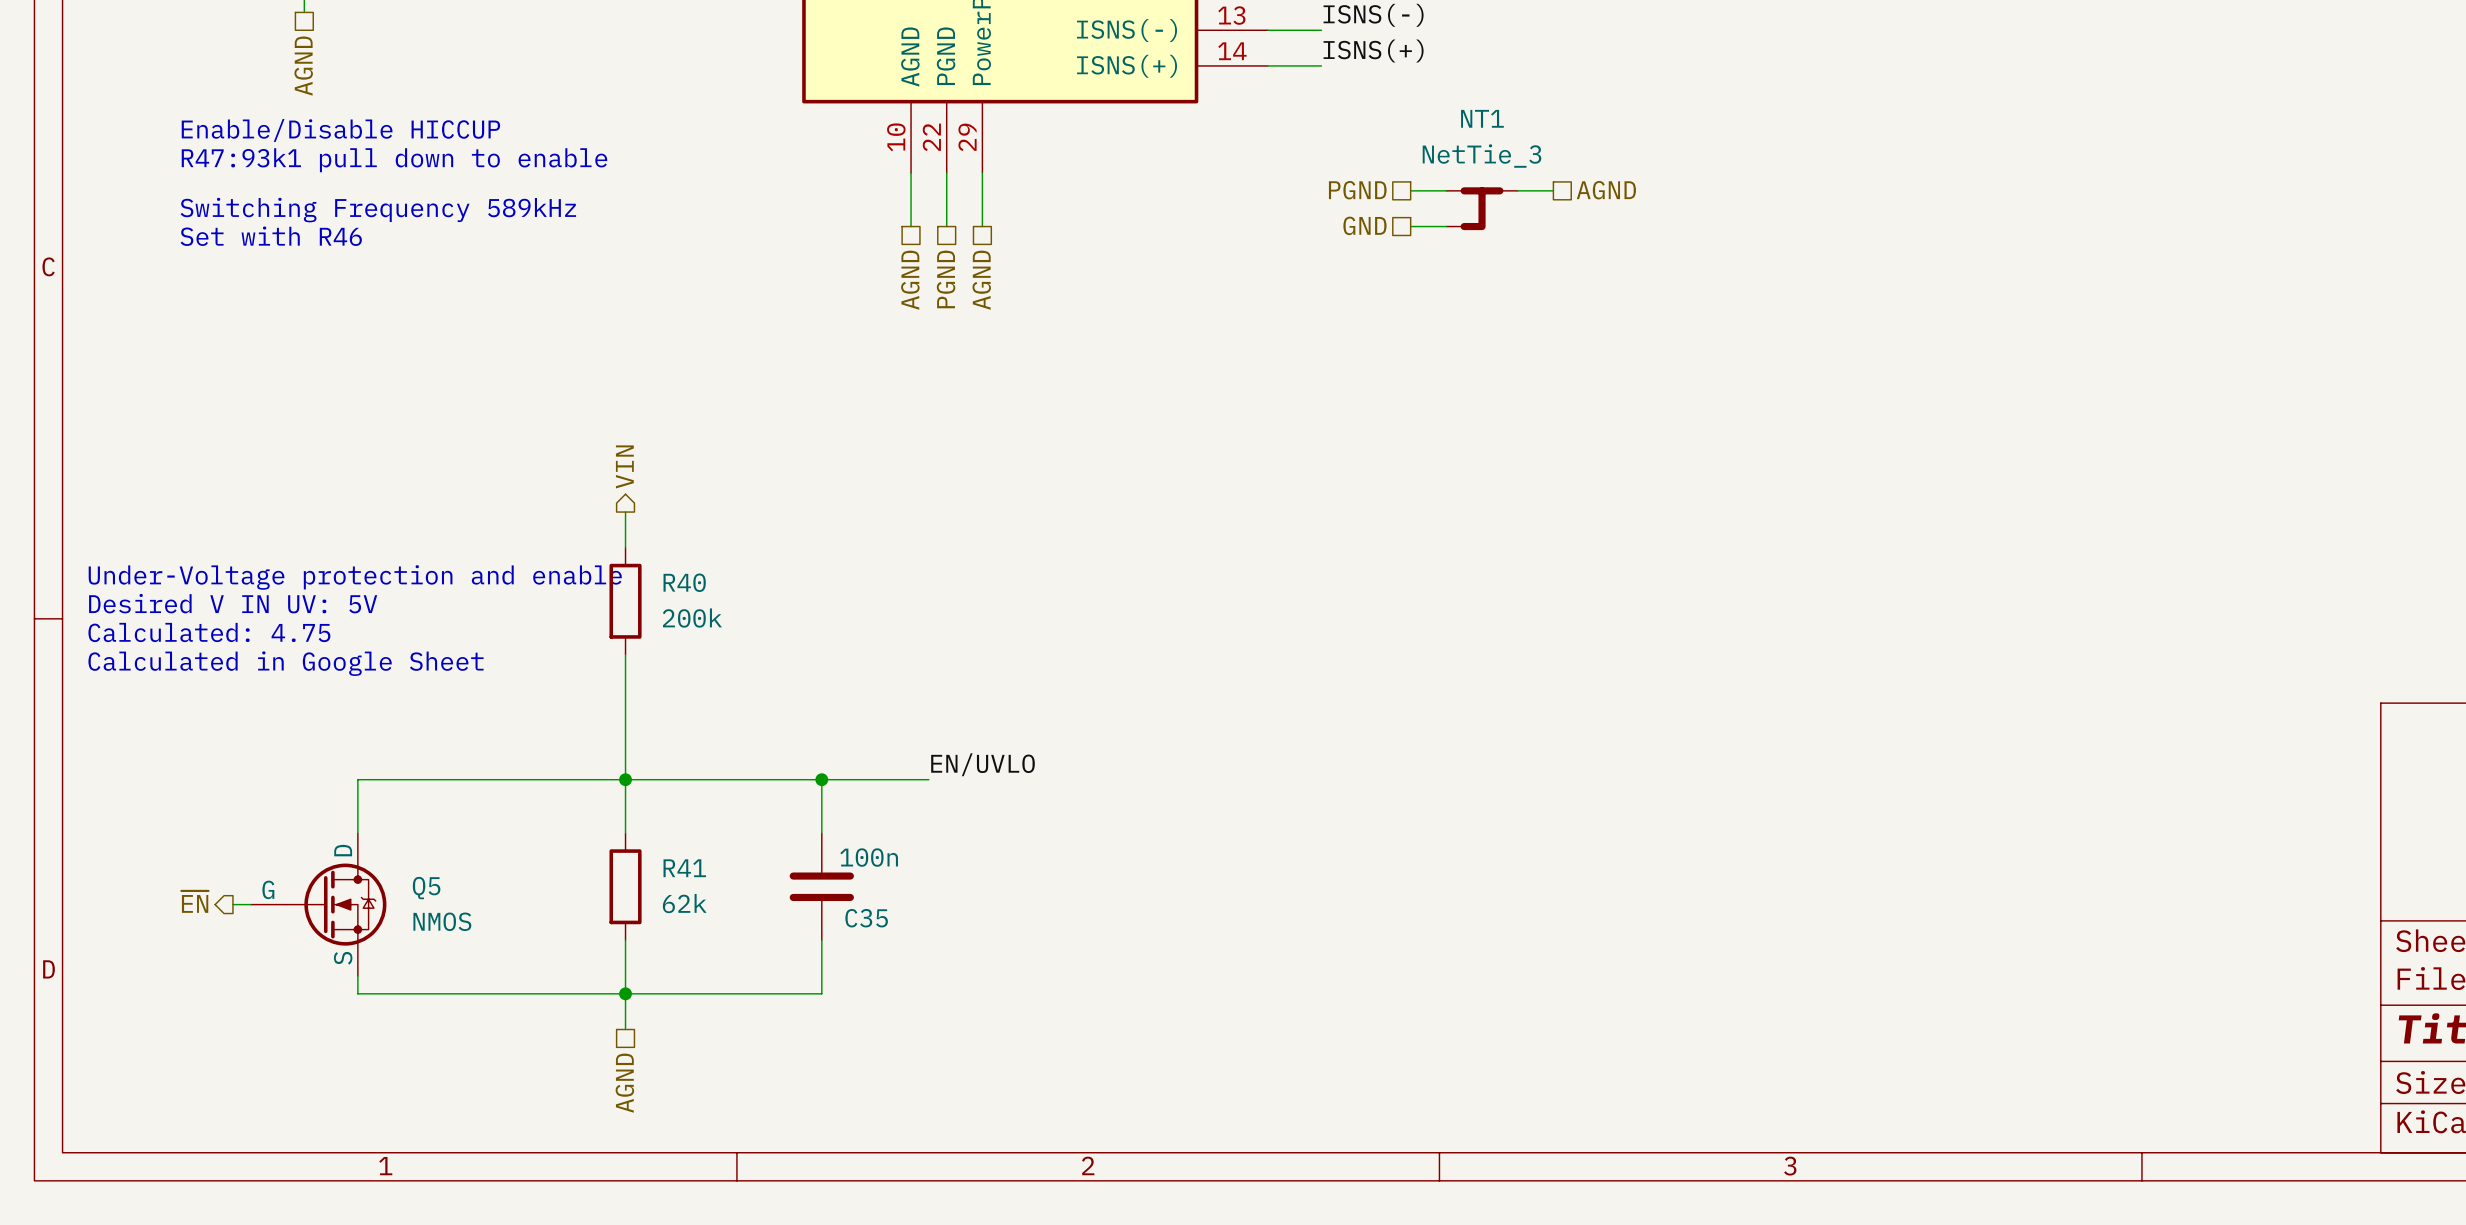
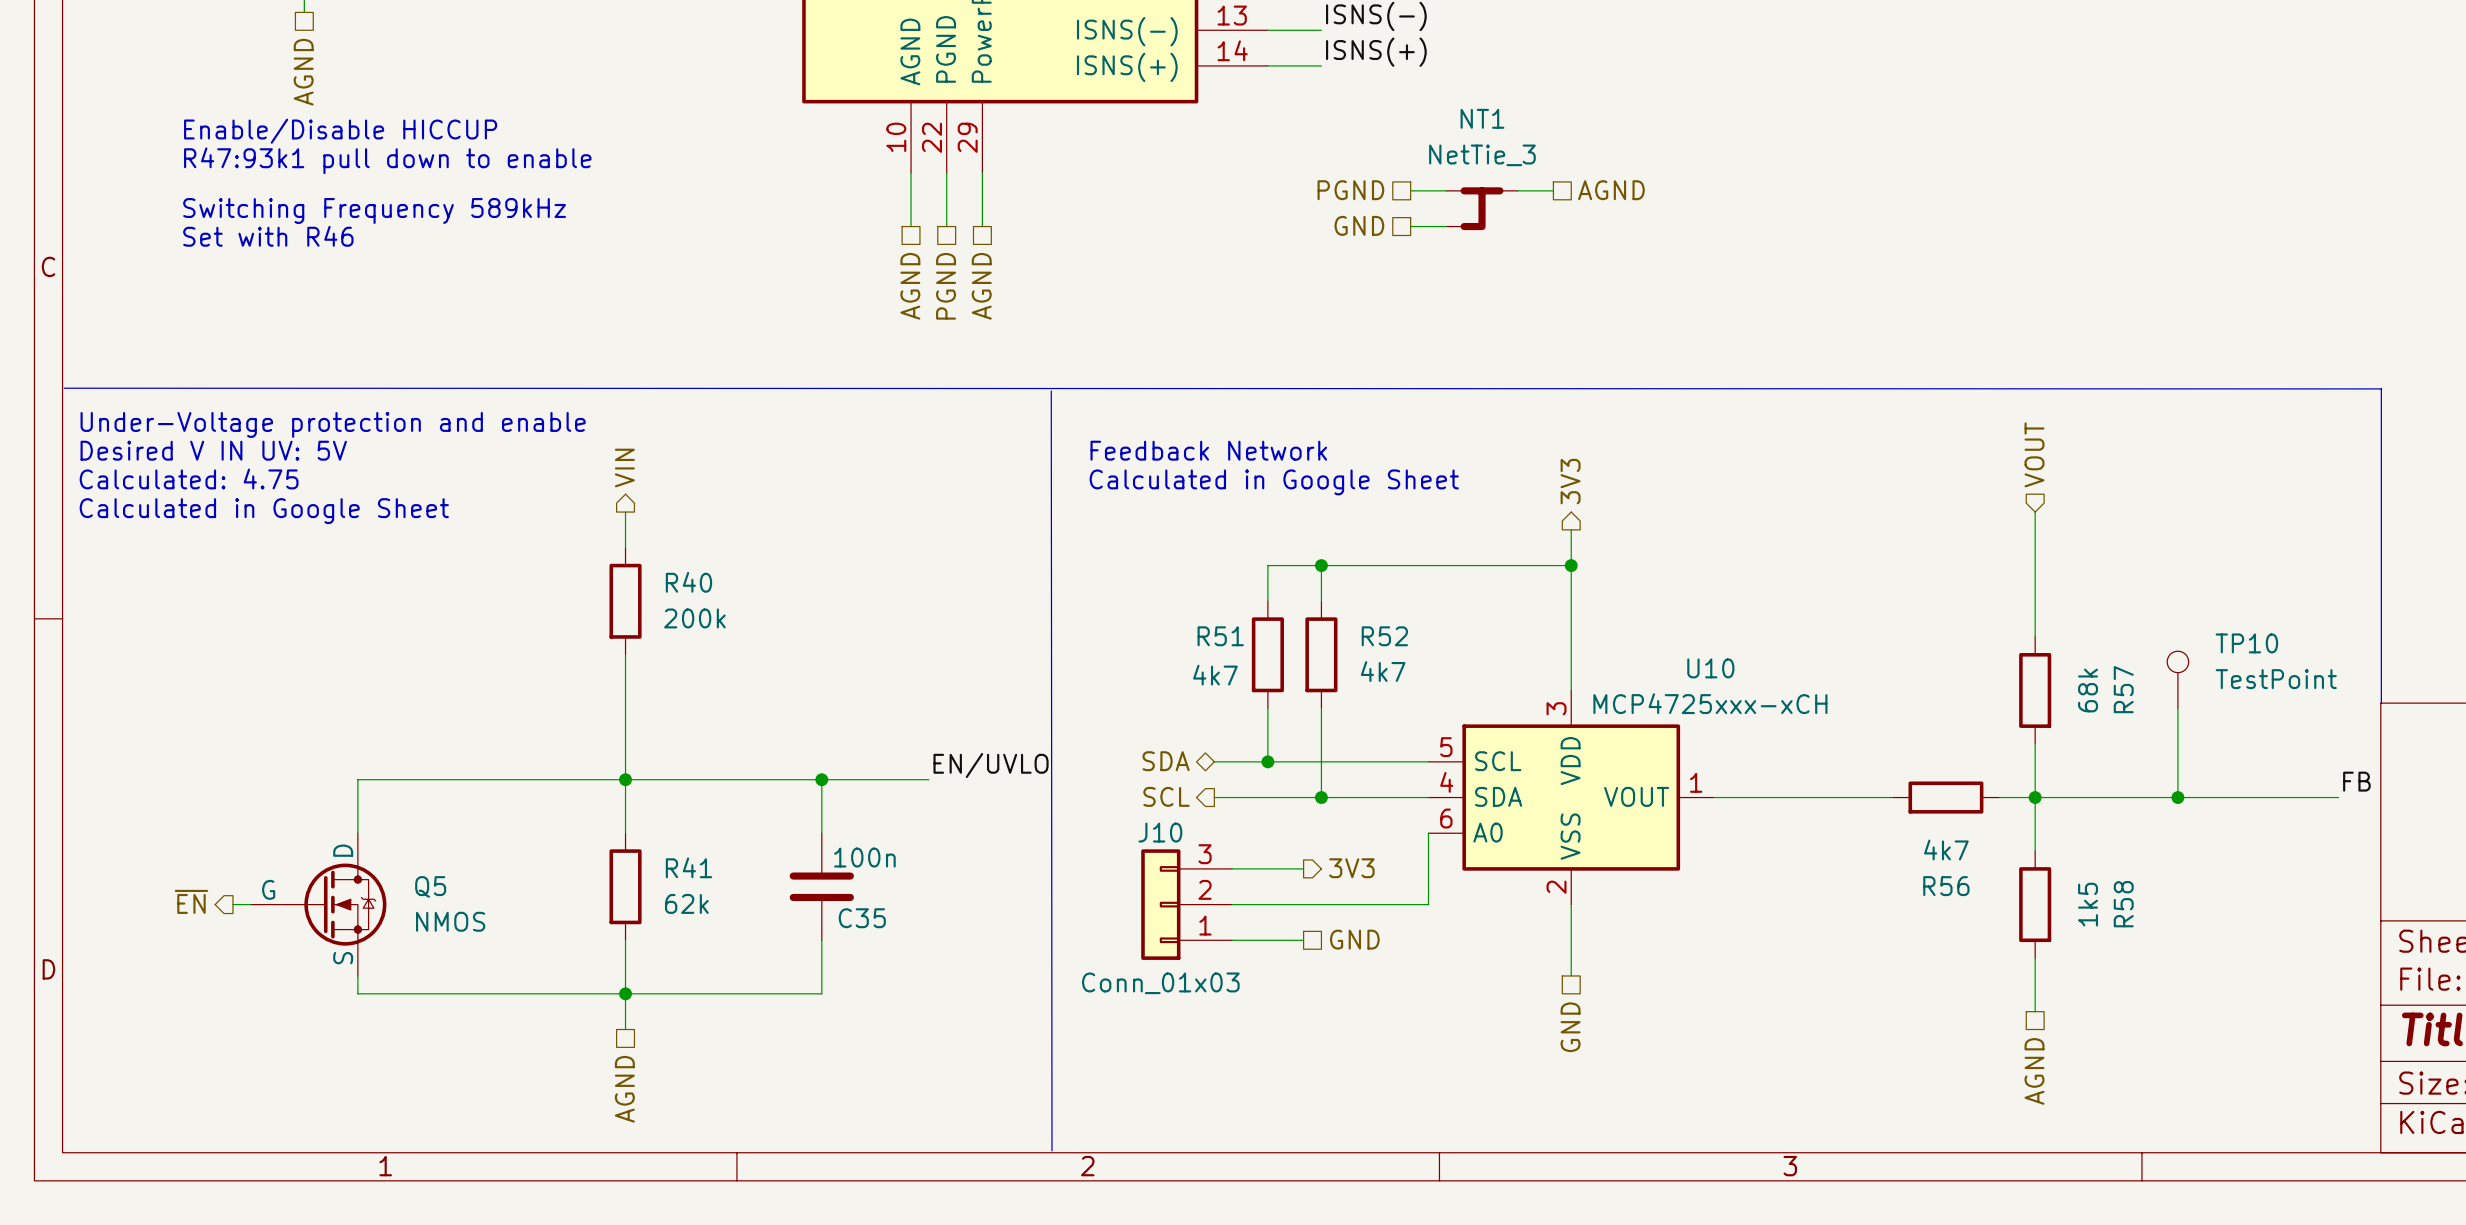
line: none -> (64, 388) (2381, 388) (2381, 702)
line: none -> (1051, 391) (1051, 1150)
text: none -> Feedback Network (1208, 450)
hierarchical label: none -> VOUT (2034, 454)
text: none -> Calculated in Google Sheet (1274, 482)
hierarchical label: none -> 3V3 (1570, 481)
wire: none -> (2035, 512) (2035, 636)
wire: none -> (1571, 529) (1571, 690)
wire: none -> (1321, 565) (1321, 601)
junction: none -> (1321, 565)
wire: none -> (1571, 565) (1267, 565) (1267, 601)
junction: none -> (1571, 565)
text position: Under-Voltage protection and enable (355, 577) -> Under-Voltage protection and enable (333, 424)
text position: Desired V IN UV: 5V (233, 603) -> Desired V IN UV: 5V (213, 450)
text position: Calculated: 4.75 (209, 632) -> Calculated: 4.75 (189, 478)
R51: none -> 4k7 (1267, 654)
R52: none -> 4k7 (1321, 654)
text position: Calculated in Google Sheet (286, 663) -> Calculated in Google Sheet (264, 511)
TP10: none -> TestPoint (2177, 679)
R57: none -> 68k (2035, 690)
wire: none -> (1267, 708) (1267, 761)
wire: none -> (1321, 708) (1321, 797)
wire: none -> (2177, 708) (2177, 797)
wire: none -> (2035, 744) (2035, 851)
hierarchical label: none -> SDA (1166, 761)
wire: none -> (1214, 761) (1428, 761)
junction: none -> (1267, 761)
label: none -> FB (2356, 781)
hierarchical label: none -> SCL (1166, 796)
wire: none -> (1214, 797) (1428, 797)
junction: none -> (1321, 797)
U10: none -> MCP4725xxx-xCH (1571, 797)
wire: none -> (1713, 797) (1892, 797)
R56: none -> 4k7 (1945, 797)
wire: none -> (1999, 797) (2338, 797)
junction: none -> (2035, 797)
junction: none -> (2177, 797)
wire: none -> (1428, 833) (1428, 904) (1232, 904)
wire: none -> (1232, 868) (1303, 868)
hierarchical label: none -> 3V3 (1351, 868)
J10: none -> Conn_01x03 (1186, 904)
wire: none -> (1571, 904) (1571, 975)
R58: none -> 1k5 (2035, 904)
hierarchical label: none -> GND (1354, 939)
wire: none -> (1232, 940) (1303, 940)
wire: none -> (2035, 958) (2035, 1011)
hierarchical label: none -> GND (1570, 1027)
hierarchical label: none -> AGND (2034, 1071)

